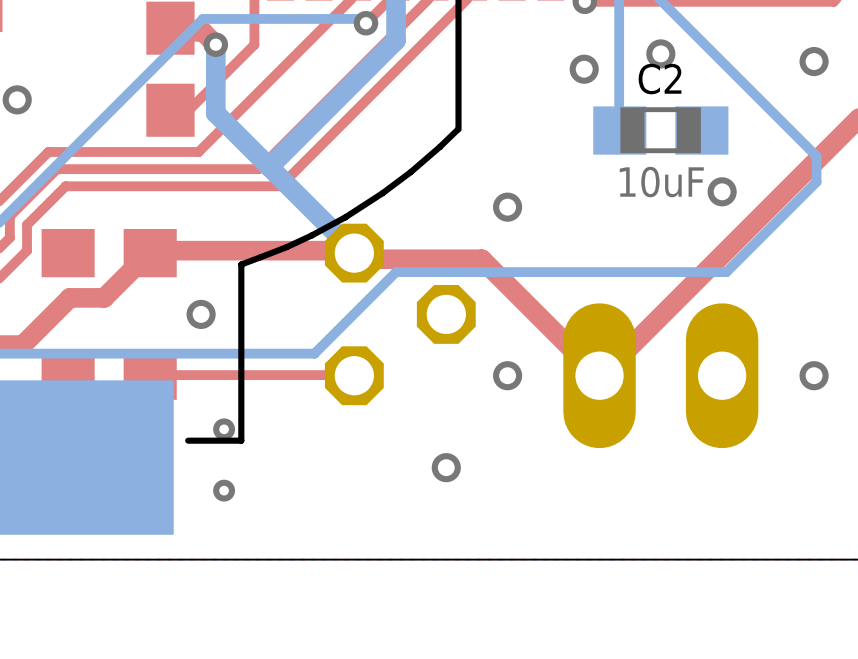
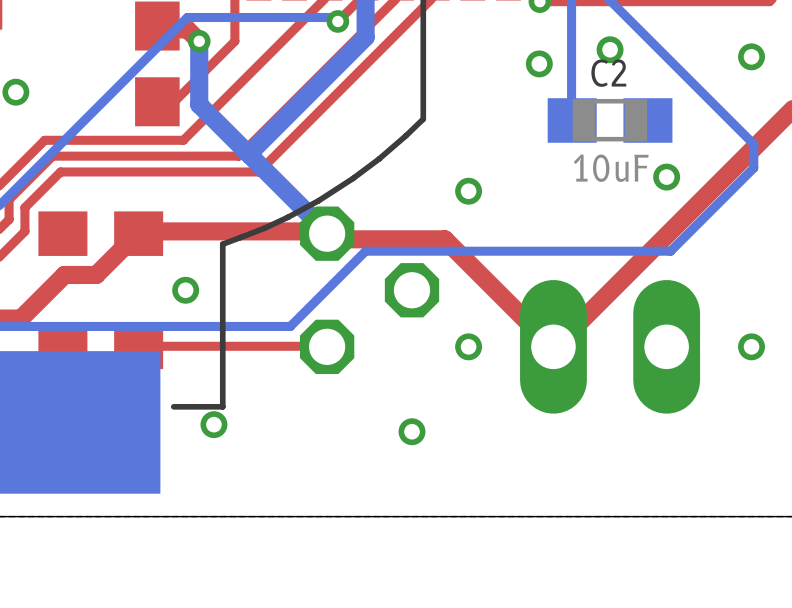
via: (224, 429) -> none
via: none -> (213, 424)
via: (224, 490) -> none

